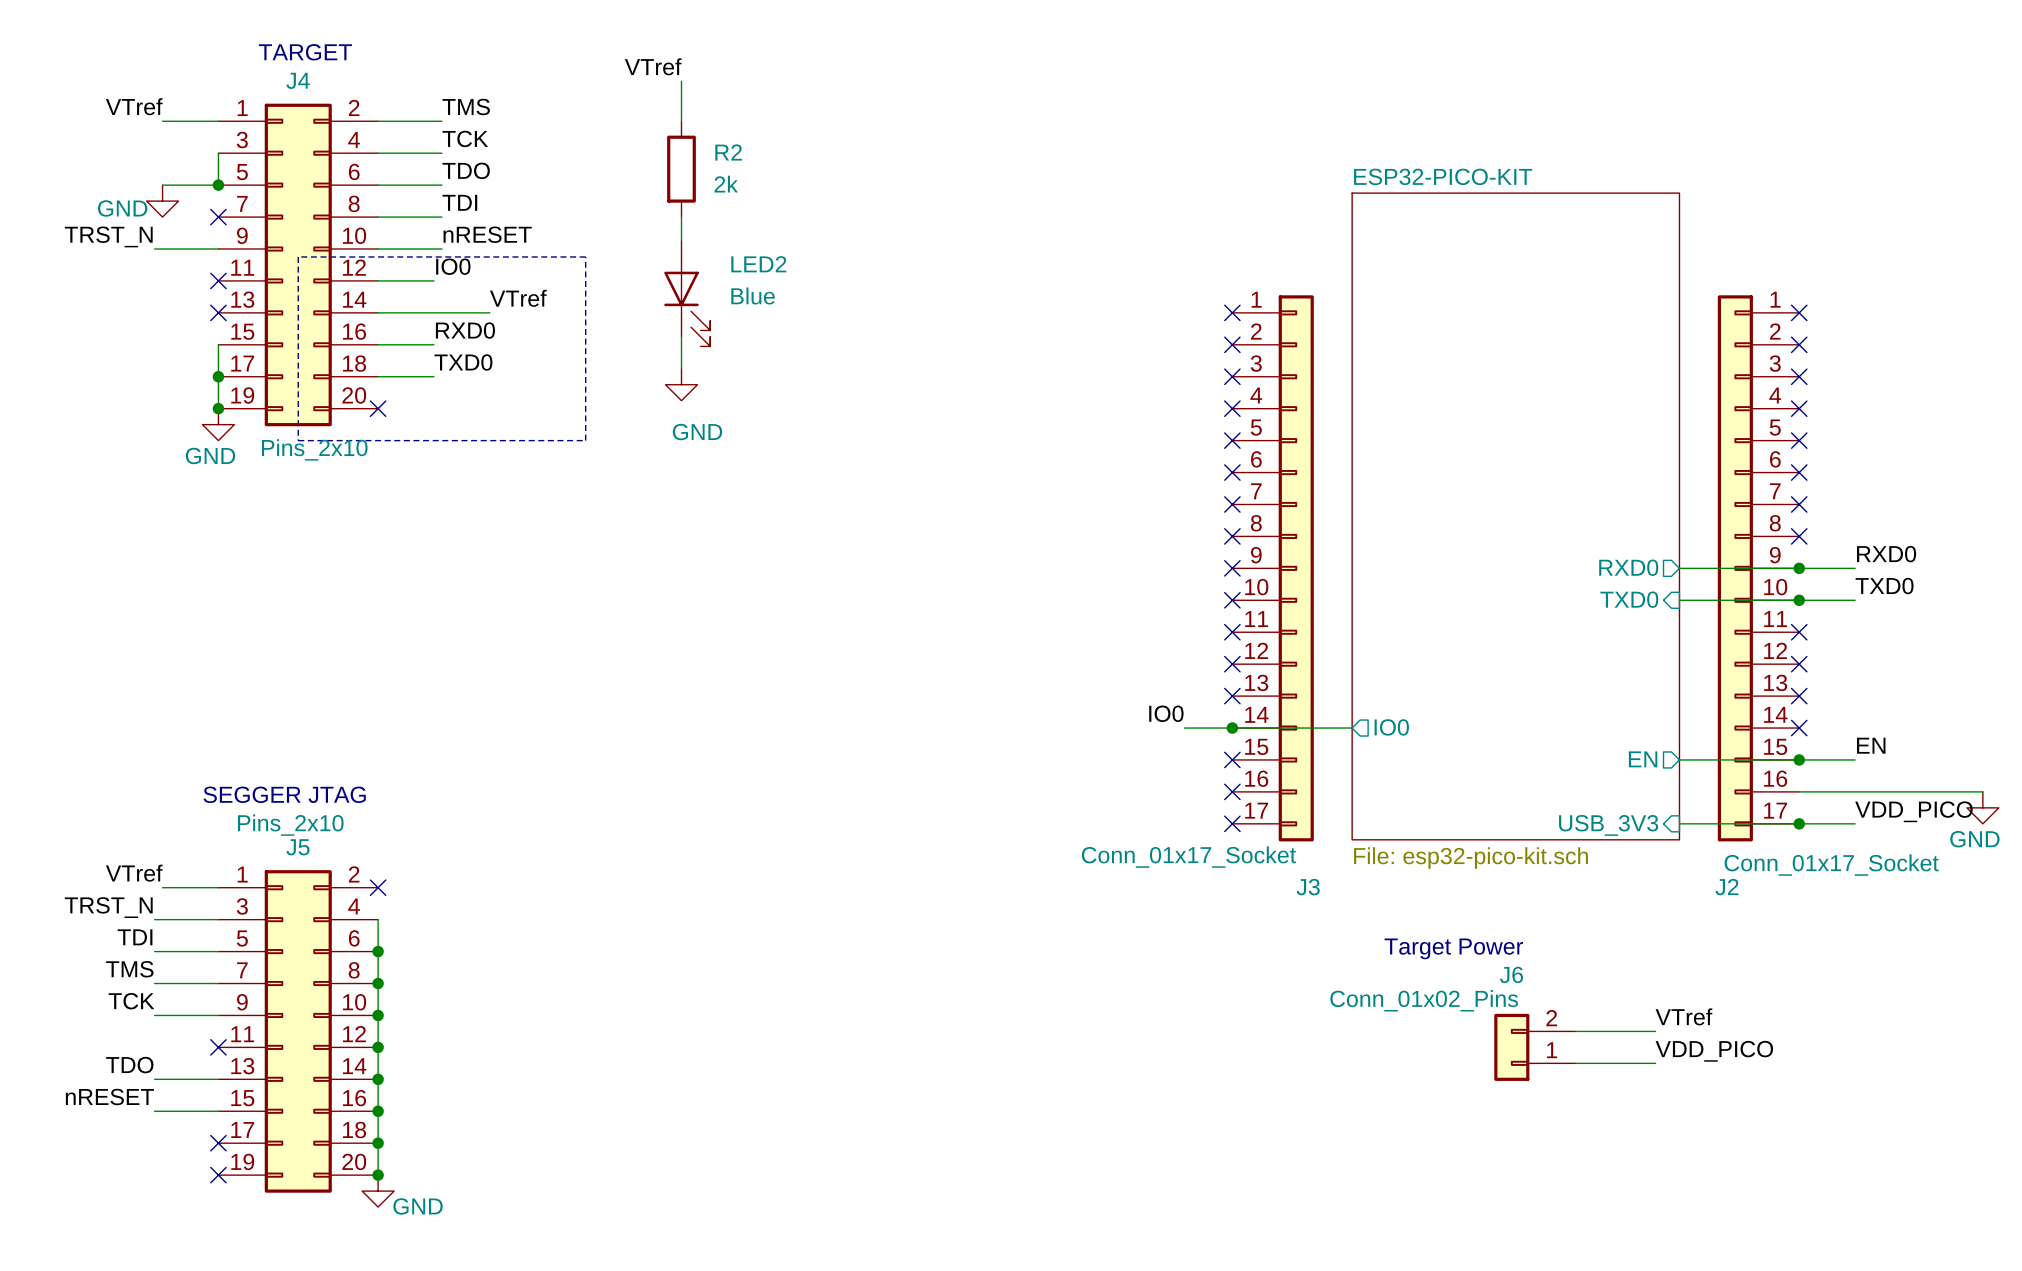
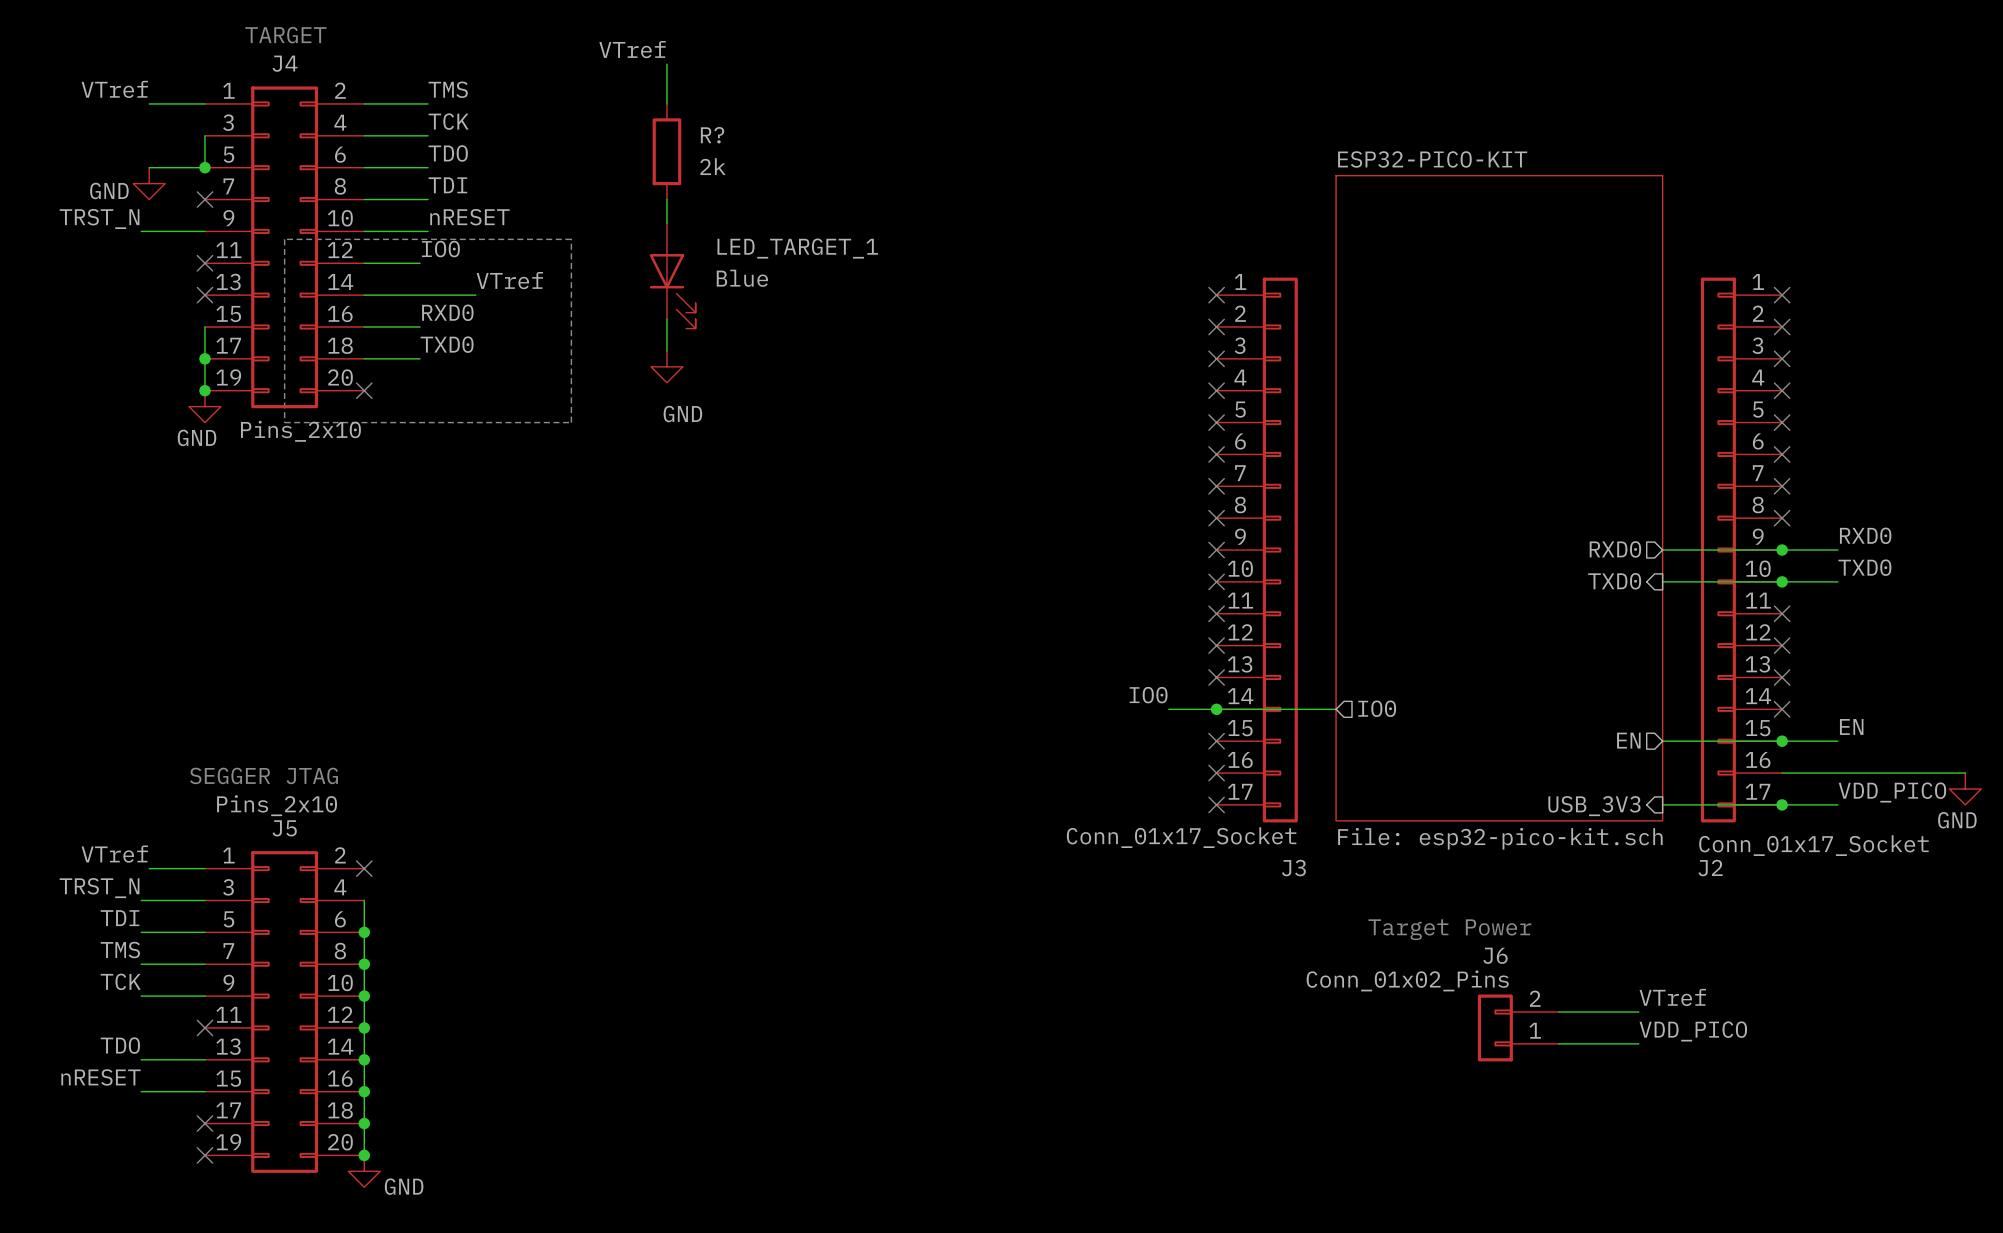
R2 name: R2 (728, 152) -> R? (712, 135)
LED2 name: LED2 (758, 264) -> LED_TARGET_1 (797, 248)

